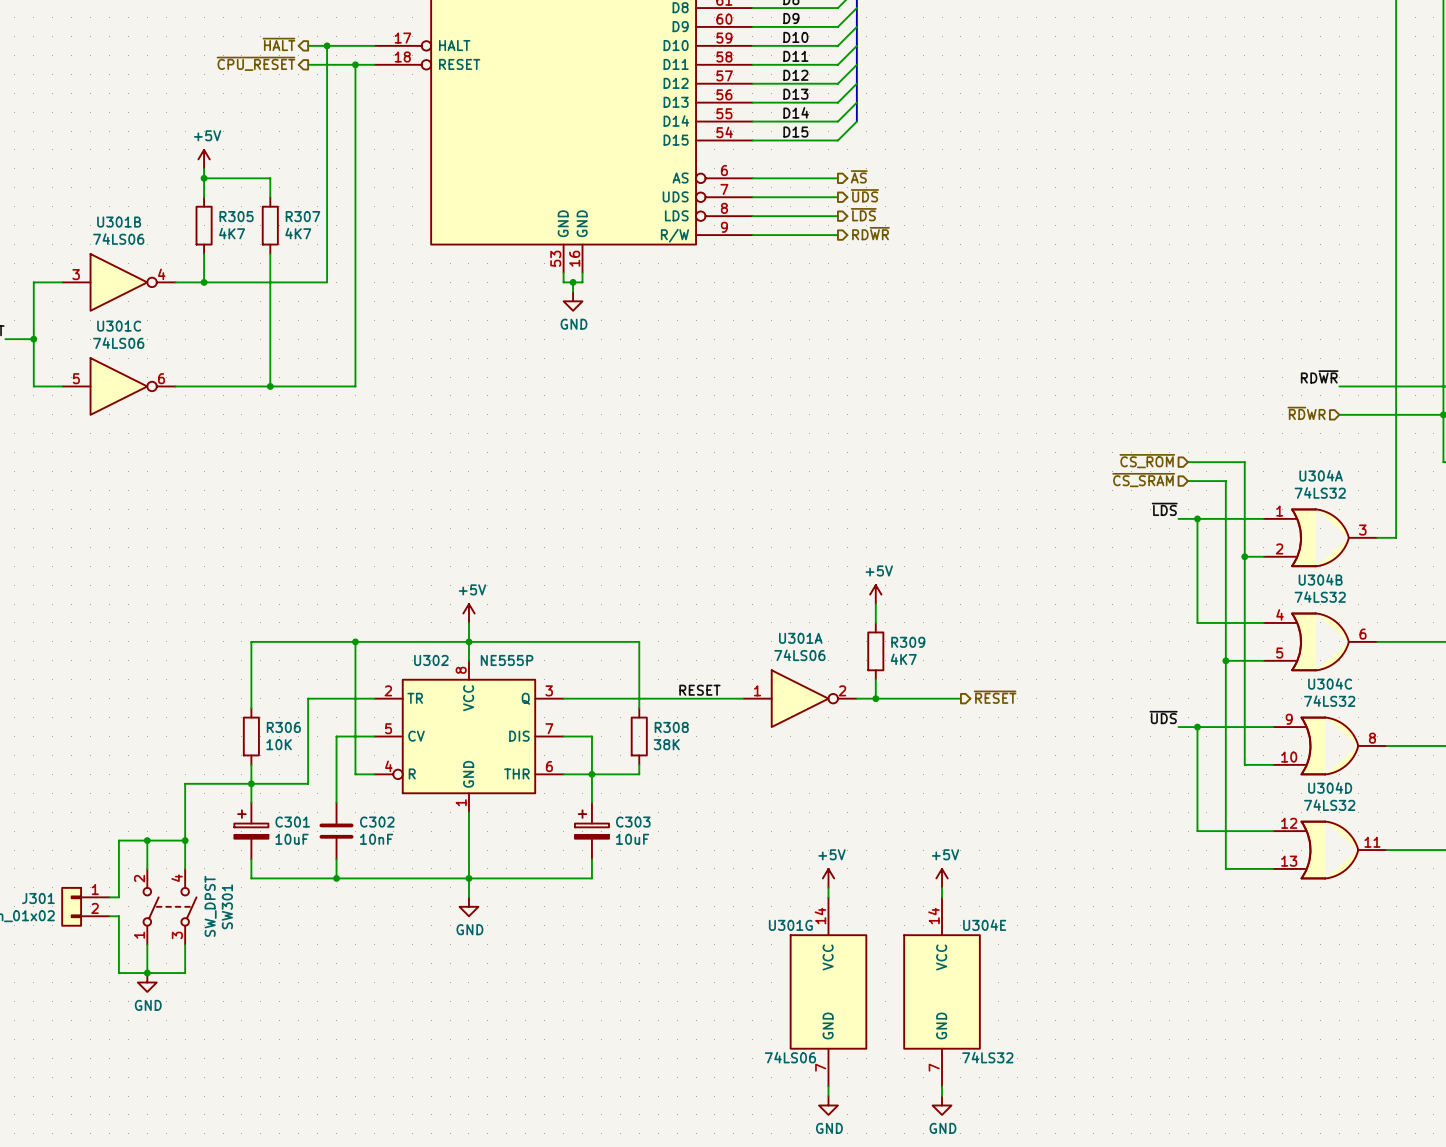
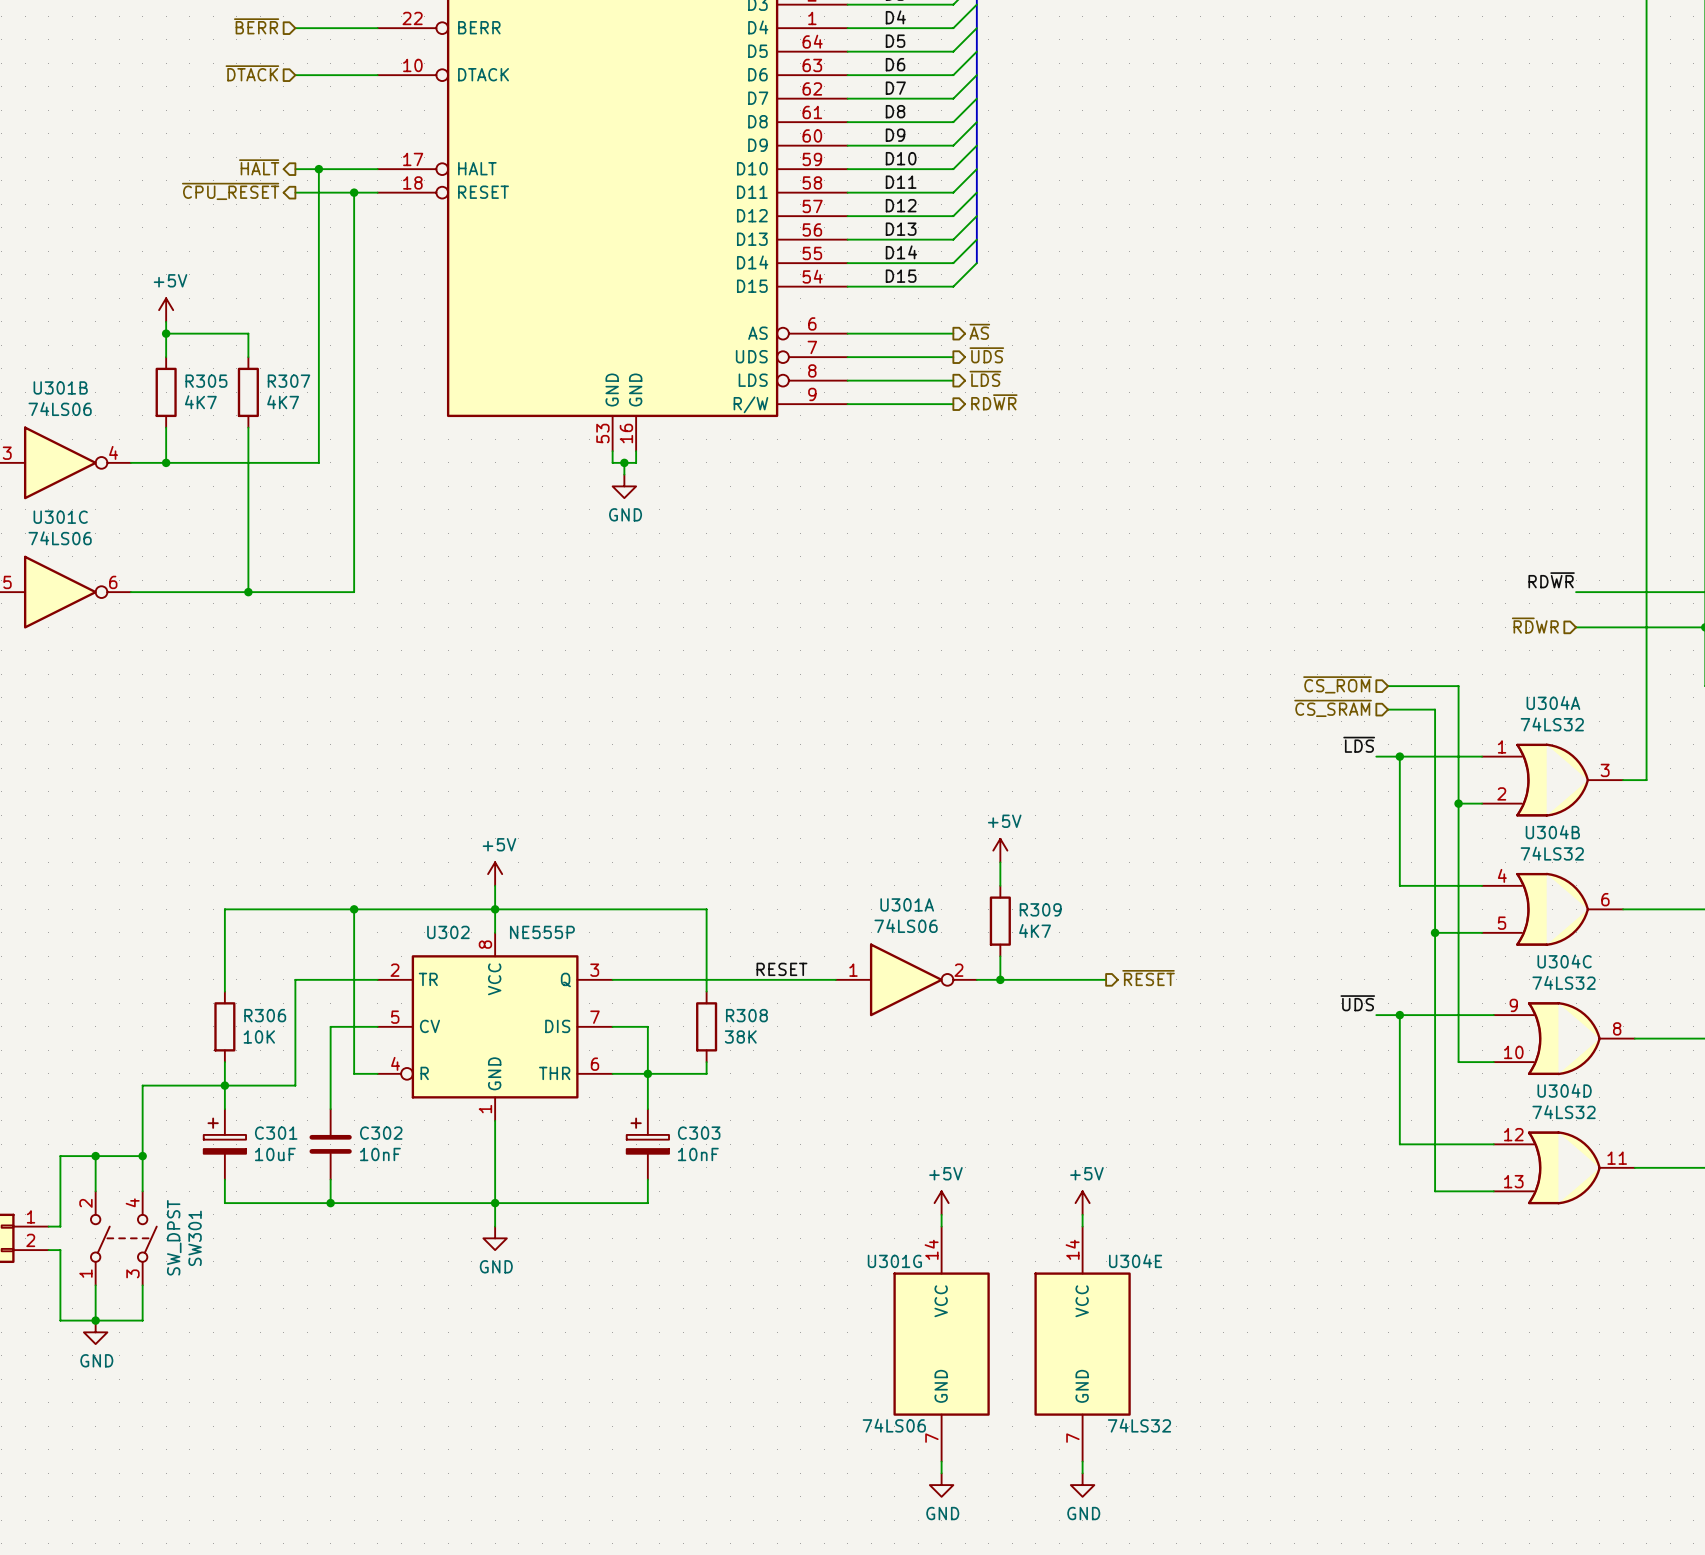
C303 value: 10uF (632, 839) -> 10nF (698, 1154)

